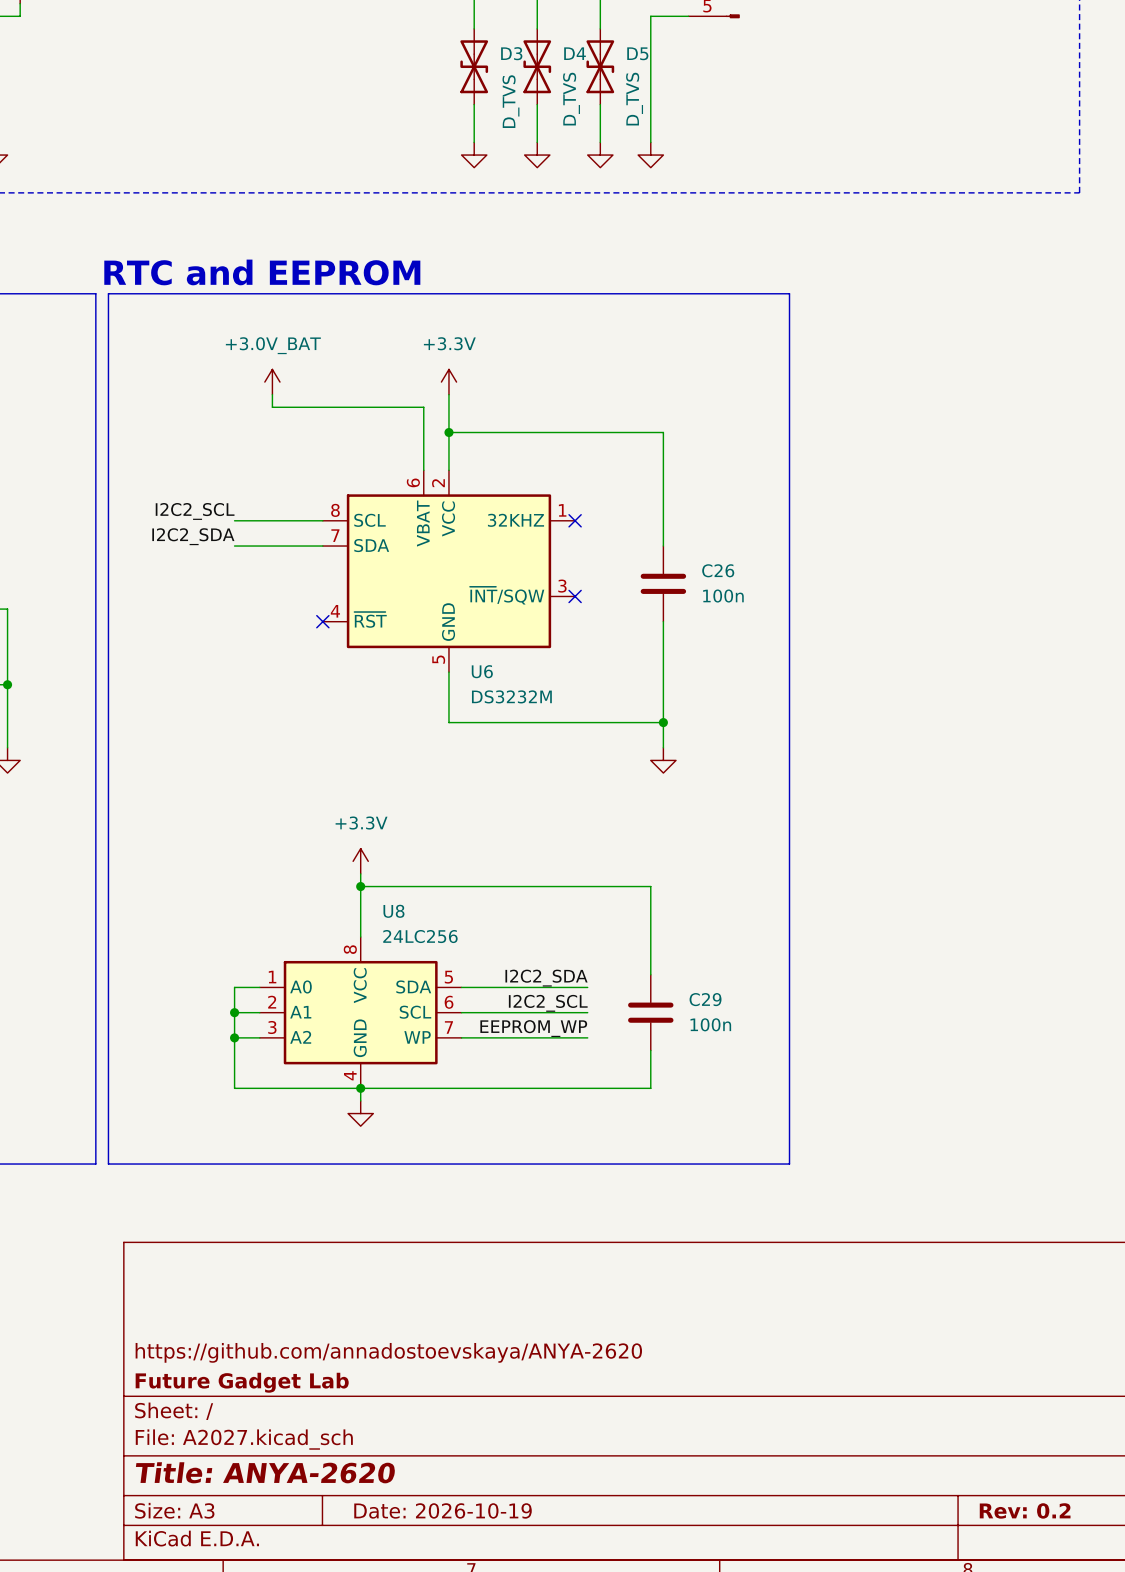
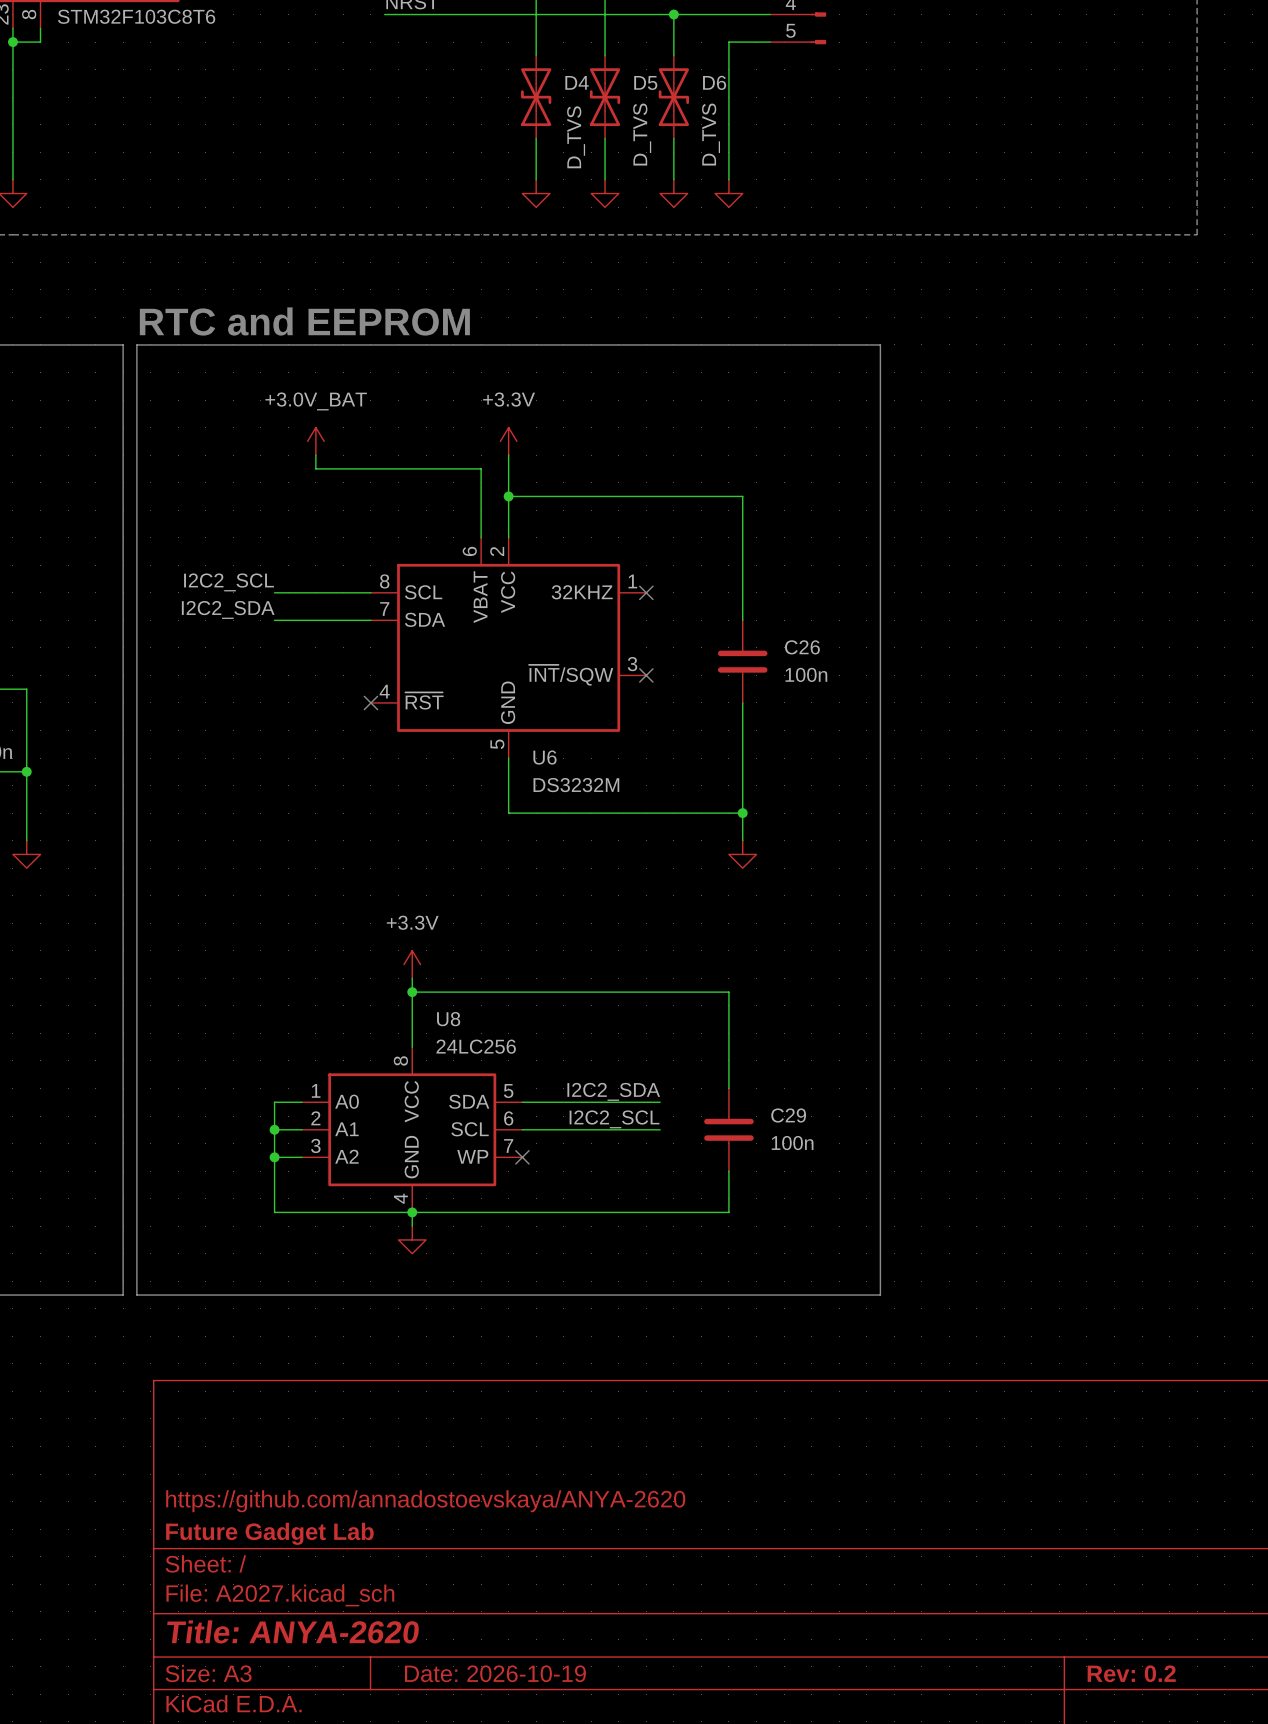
D3 name: D3 (511, 53) -> D4 (577, 82)
D4 name: D4 (575, 53) -> D5 (645, 82)
D5 name: D5 (637, 53) -> D6 (714, 82)
label: EEPROM_WP (533, 1028) -> none
wire: (461, 1037) (587, 1037) -> none
no-connect mark: none -> (522, 1157)

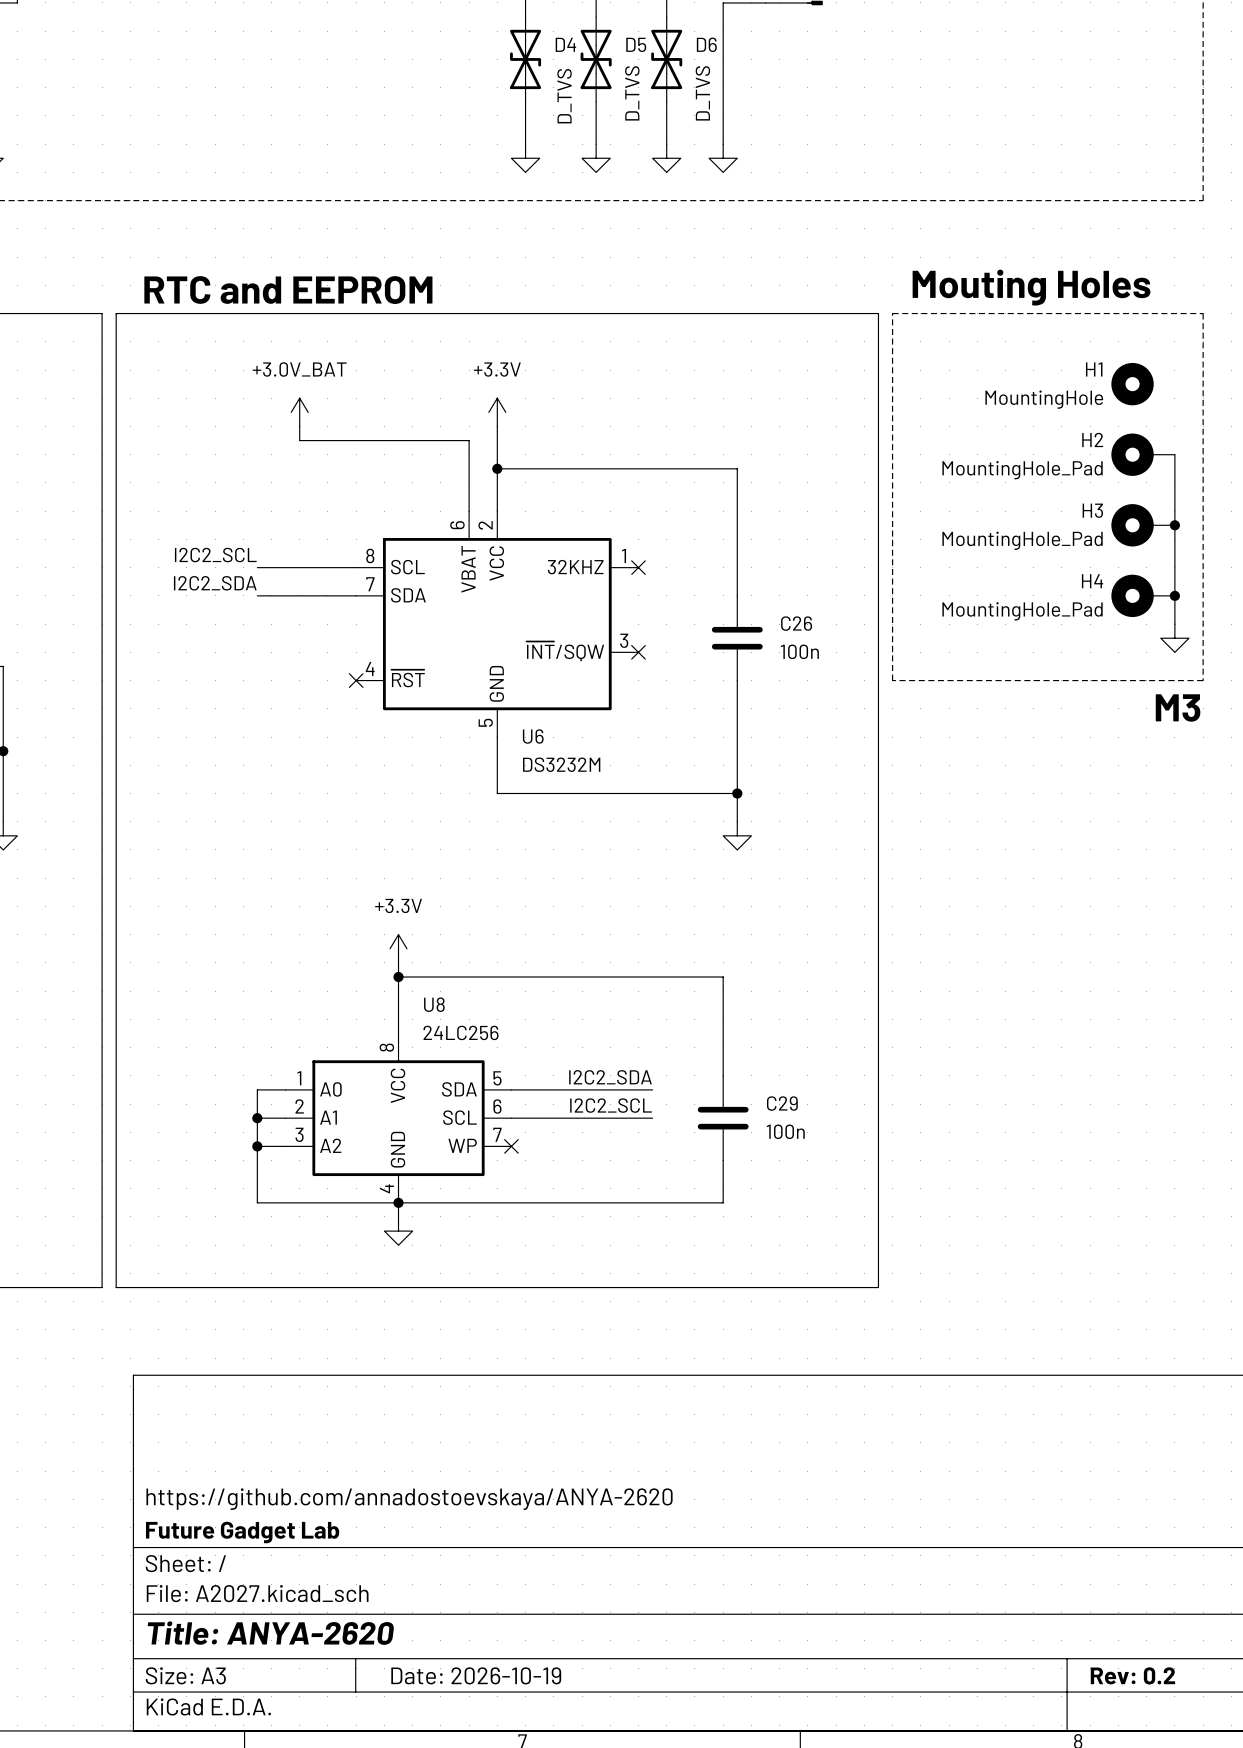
text: none -> Mouting Holes (1031, 287)
line: none -> (892, 313) (1203, 313) (1203, 680) (892, 680) (892, 313)
H1: none -> MountingHole (1132, 384)
H2: none -> MountingHole_Pad (1143, 454)
wire: none -> (1174, 454) (1174, 624)
H3: none -> MountingHole_Pad (1143, 525)
junction: none -> (1174, 525)
H4: none -> MountingHole_Pad (1143, 595)
junction: none -> (1174, 595)
power symbol: none -> (1174, 638)
text: none -> M3 (1178, 707)

